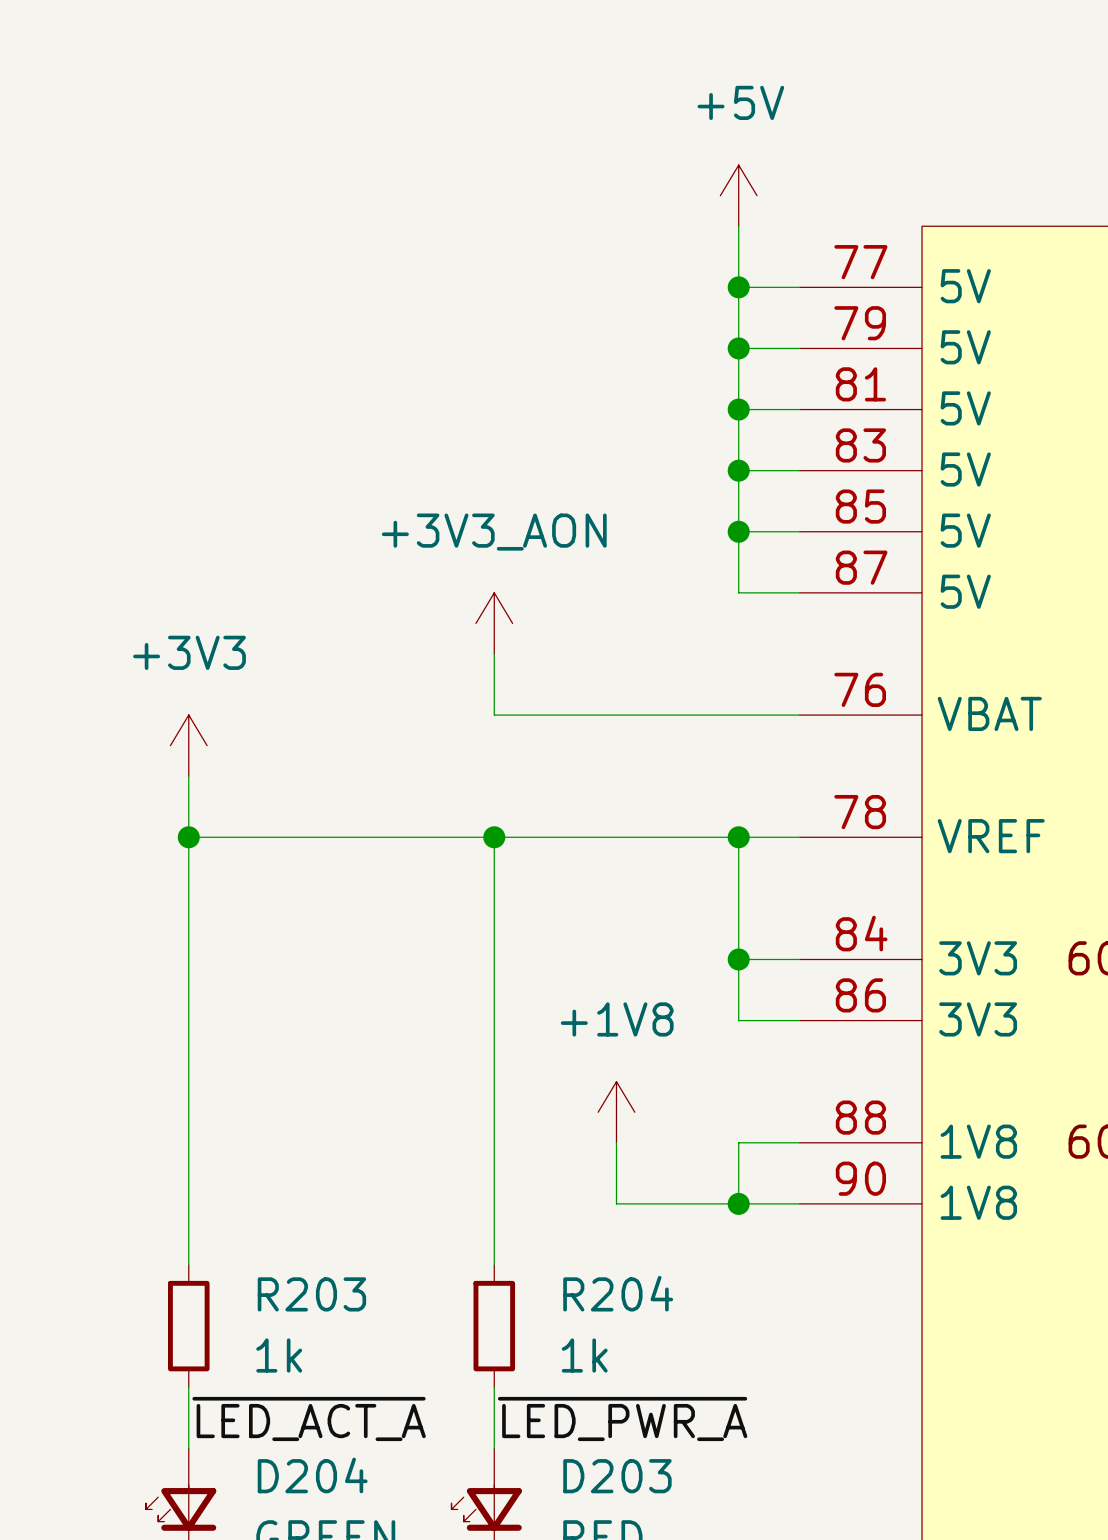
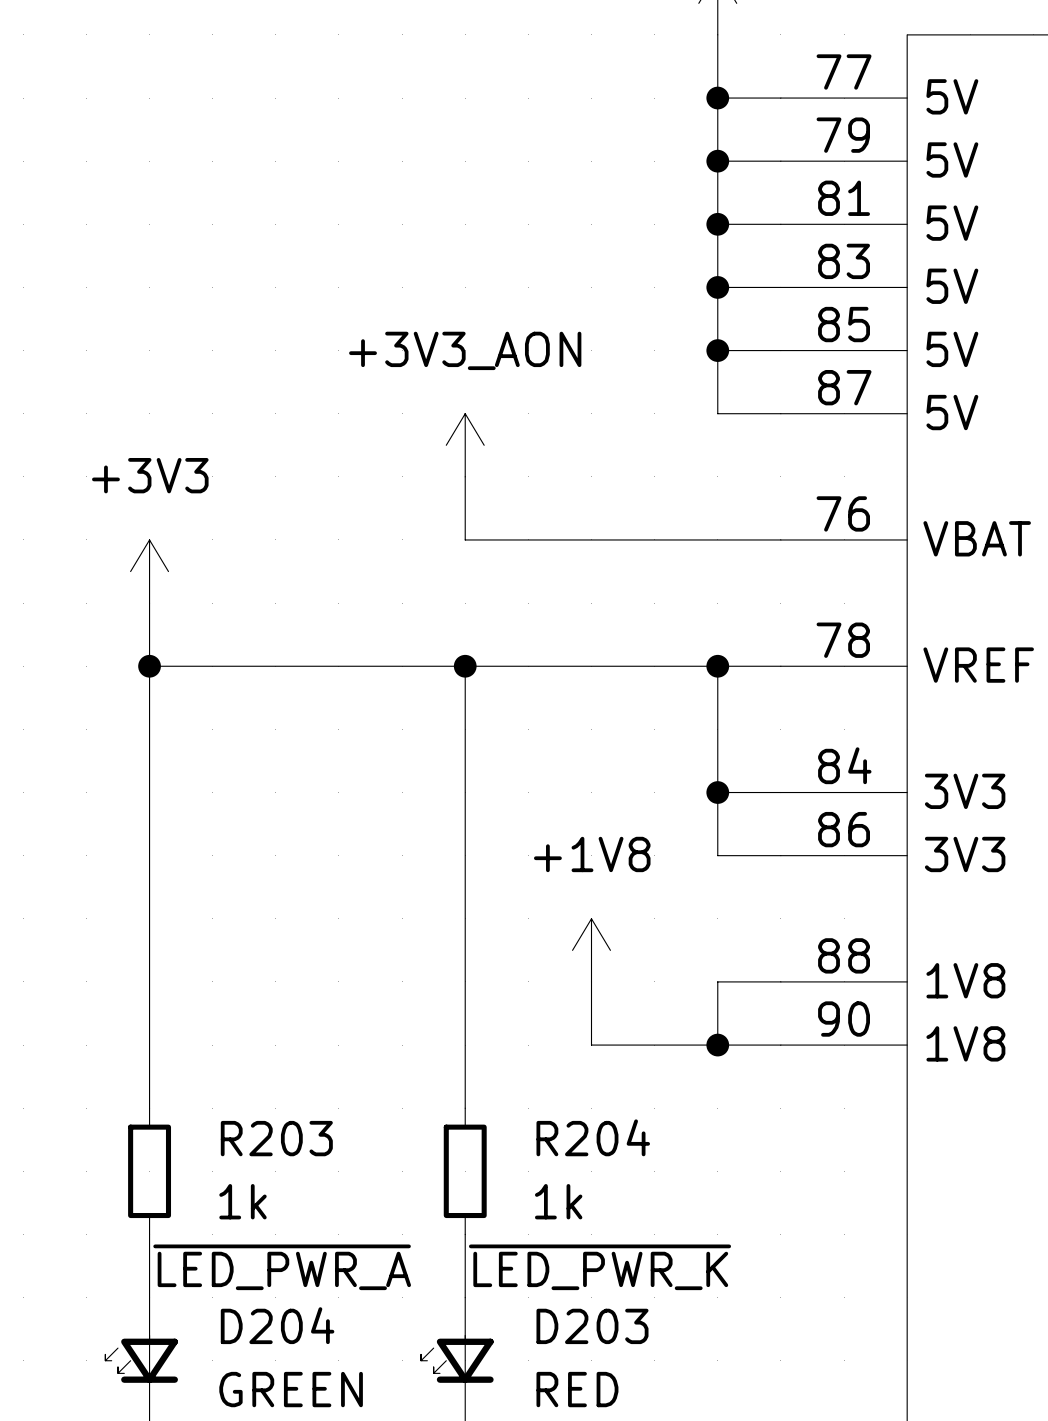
label: ~{LED_ACT_A} (309, 1418) -> ~{LED_PWR_A} (282, 1267)
label: ~{LED_PWR_A} (622, 1418) -> ~{LED_PWR_K} (600, 1267)

